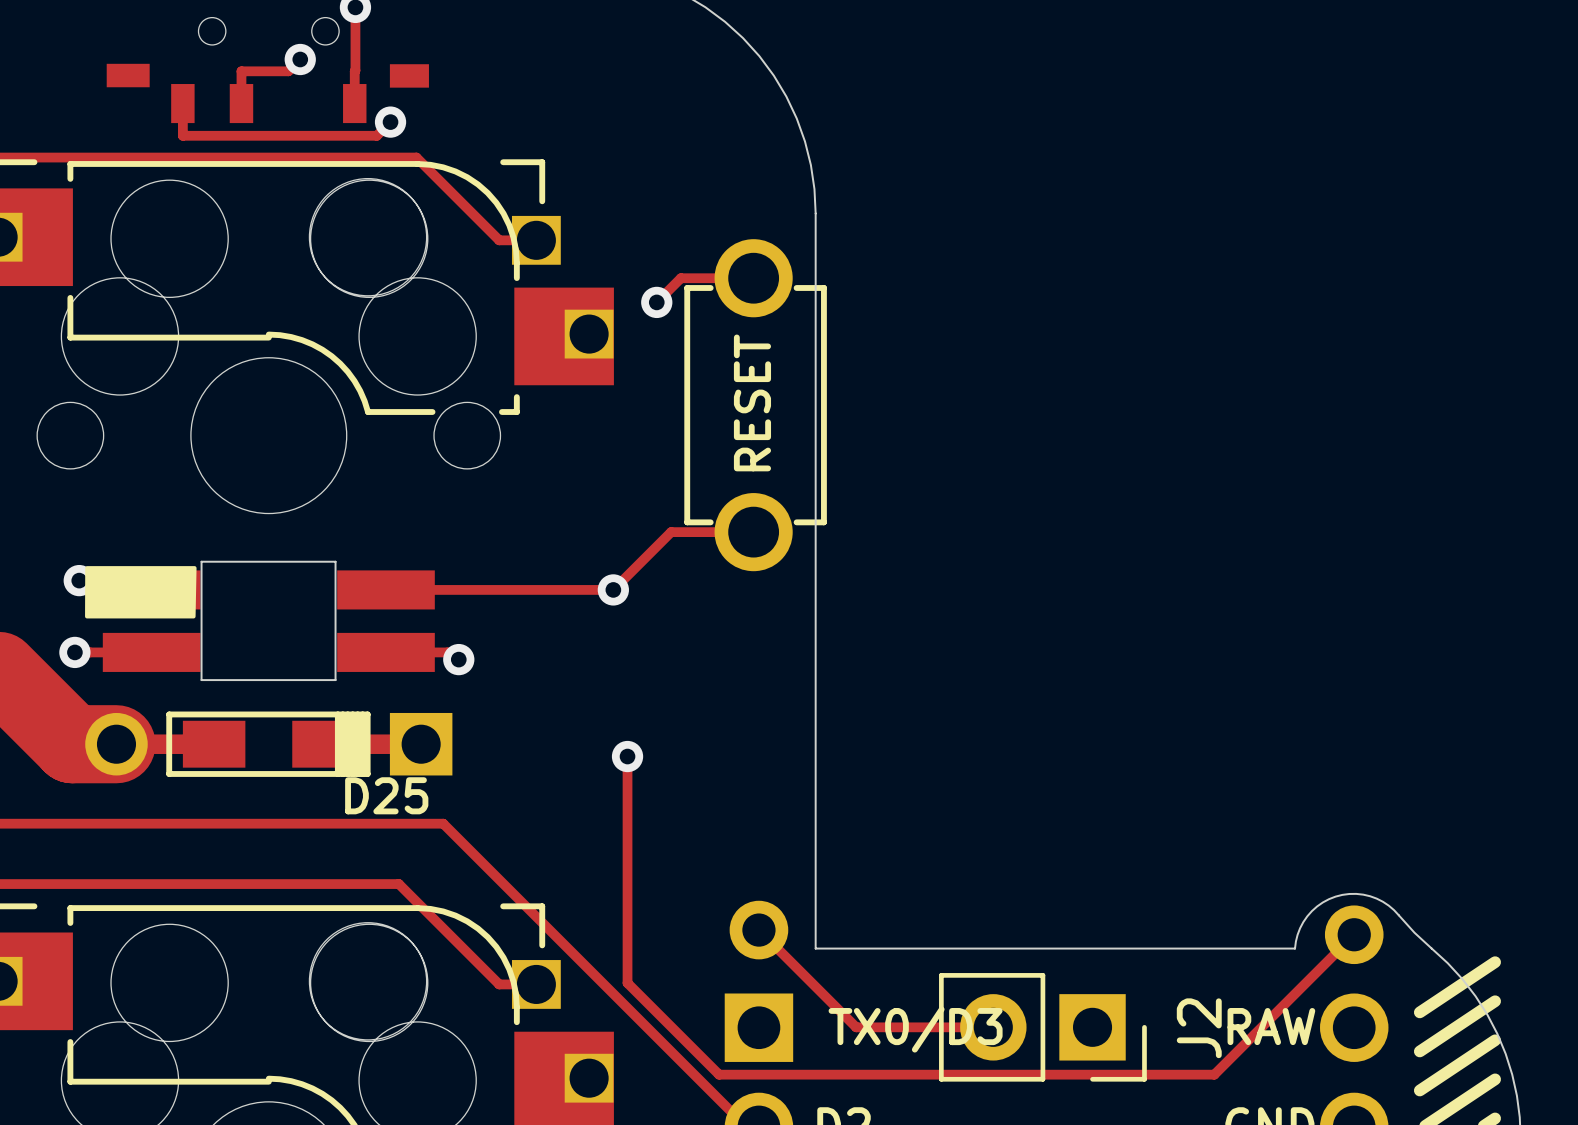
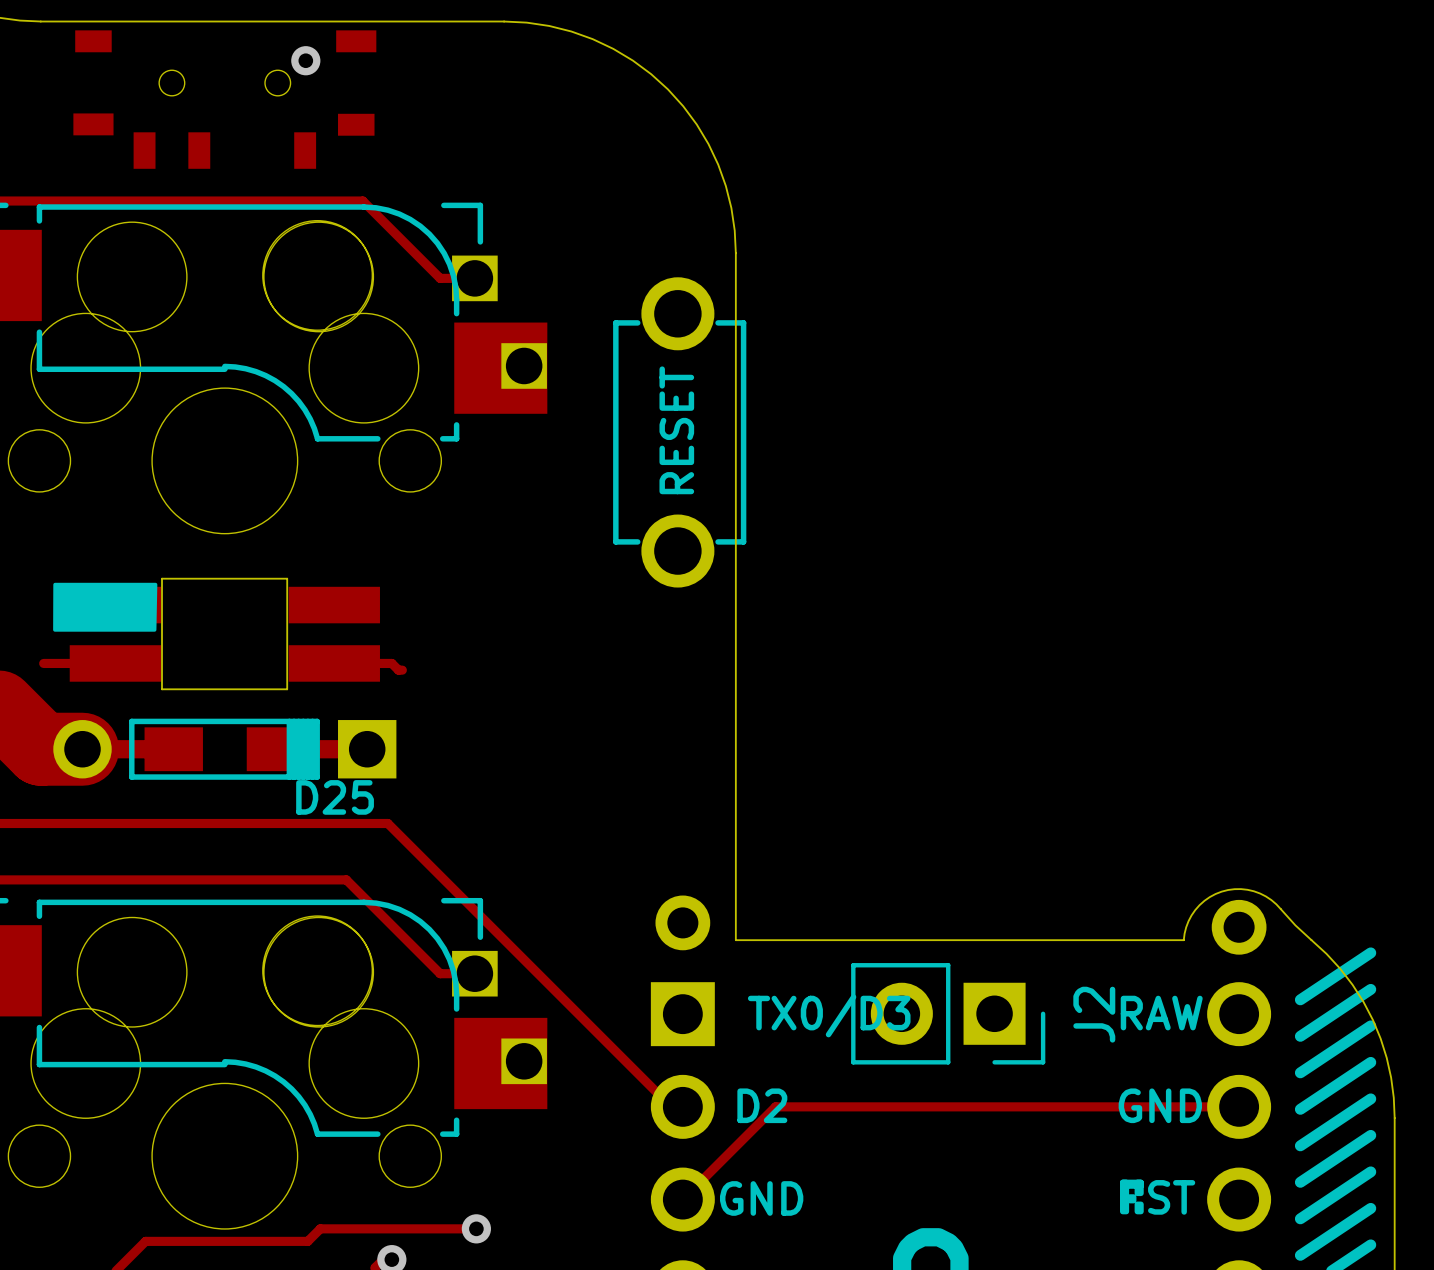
track: (355, 7) (354, 103) -> none
track: (300, 59) (288, 71) (241, 71) (241, 103) -> none
via: (300, 59) -> none
track: (182, 103) (182, 135) (376, 135) (390, 122) -> none
via: (390, 122) -> none
track: (753, 278) (680, 278) (656, 302) -> none
via: (656, 302) -> none
track: (753, 532) (671, 532) (613, 589) (386, 589) -> none
via: (79, 580) -> none
via: (613, 589) -> none
via: (74, 652) -> none
via: (458, 659) -> none
track: (627, 756) (627, 983) (719, 1074) (1214, 1074) (1354, 934) -> none
via: (627, 756) -> none
track: (758, 930) (856, 1027) (993, 1027) -> none

